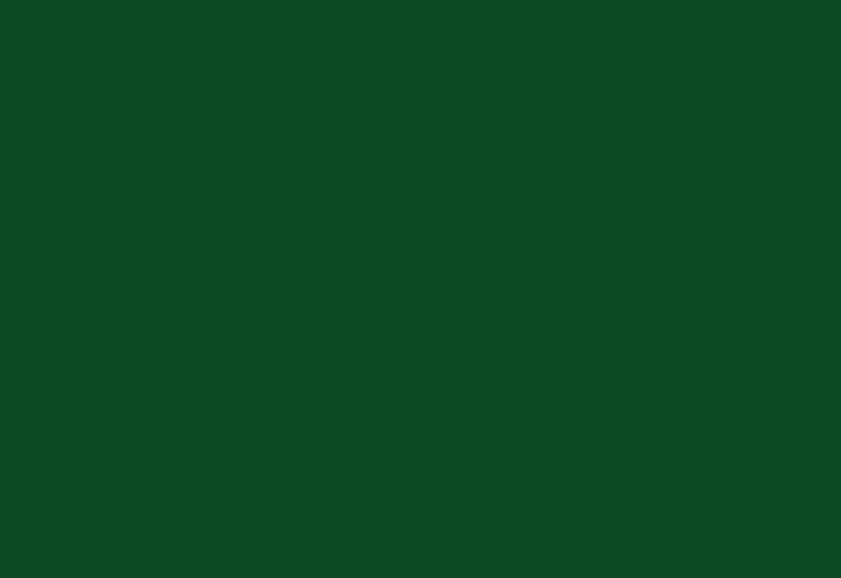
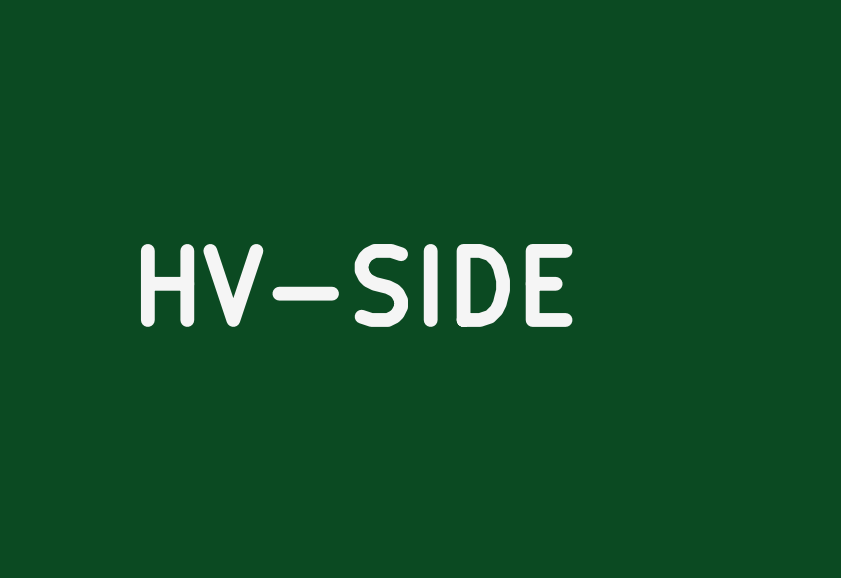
text: none -> HV-SIDE (356, 285)

